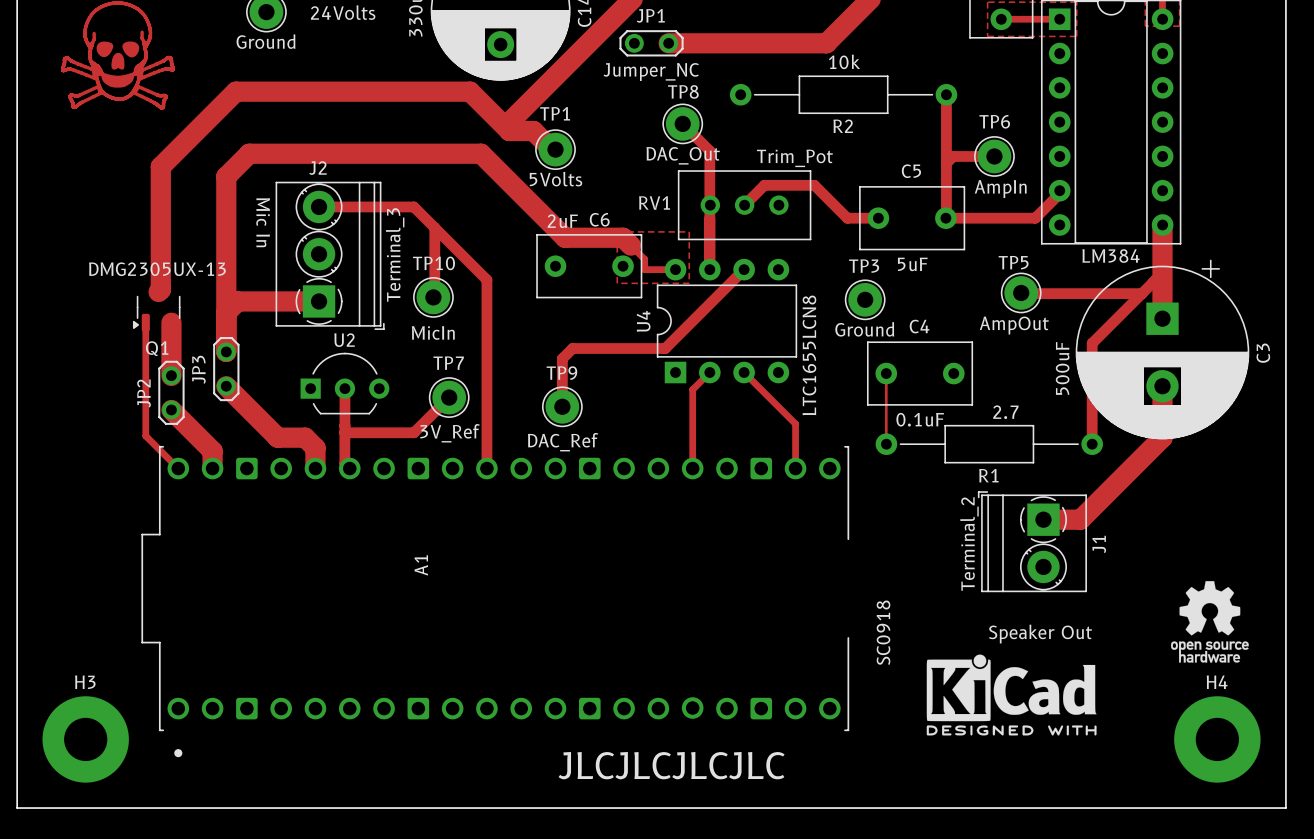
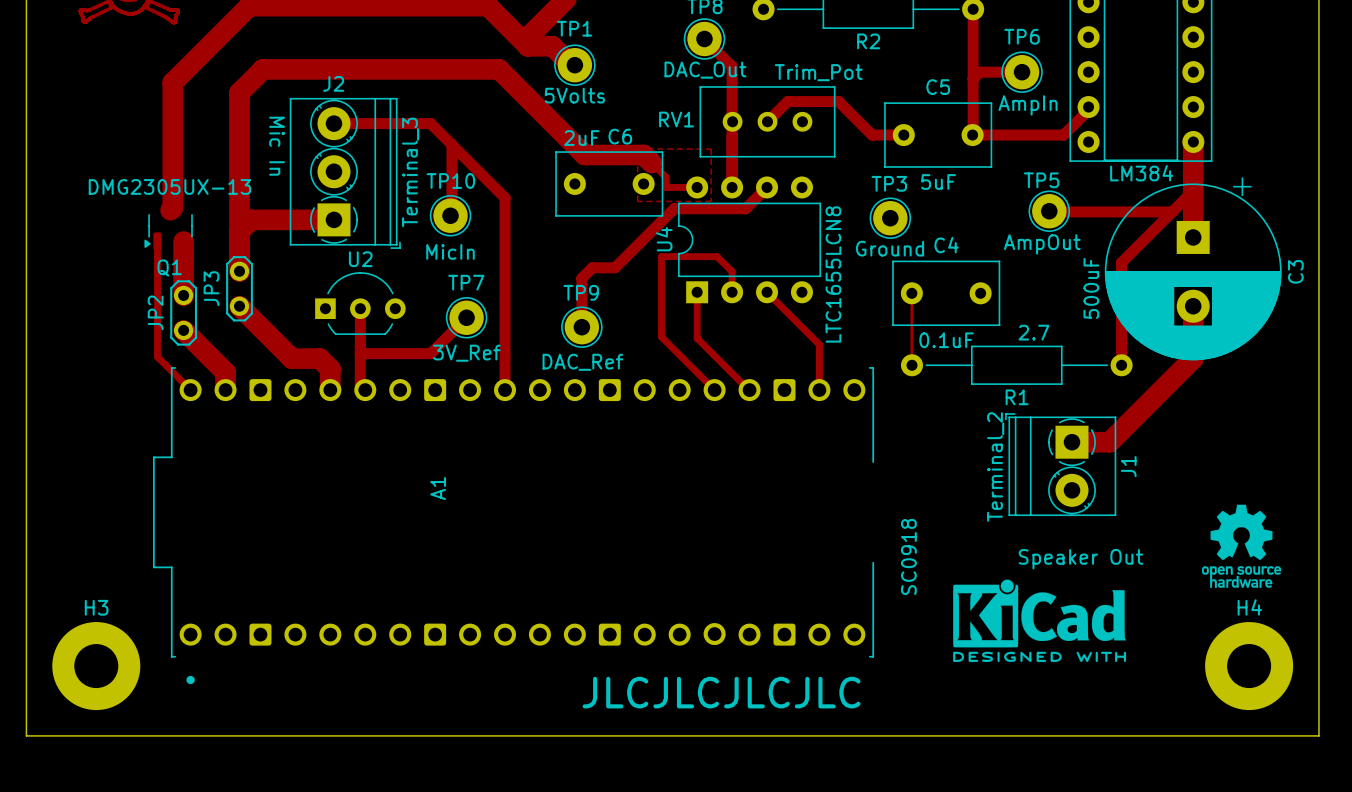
track: (723, 290) (665, 348) (594, 348) -> (745, 208) (674, 208) (615, 267)
track: none -> (697, 292) (697, 338) (748, 390)
track: (709, 372) (692, 389) (692, 468) -> (732, 292) (732, 271) (717, 256) (661, 256) (661, 336) (714, 390)

